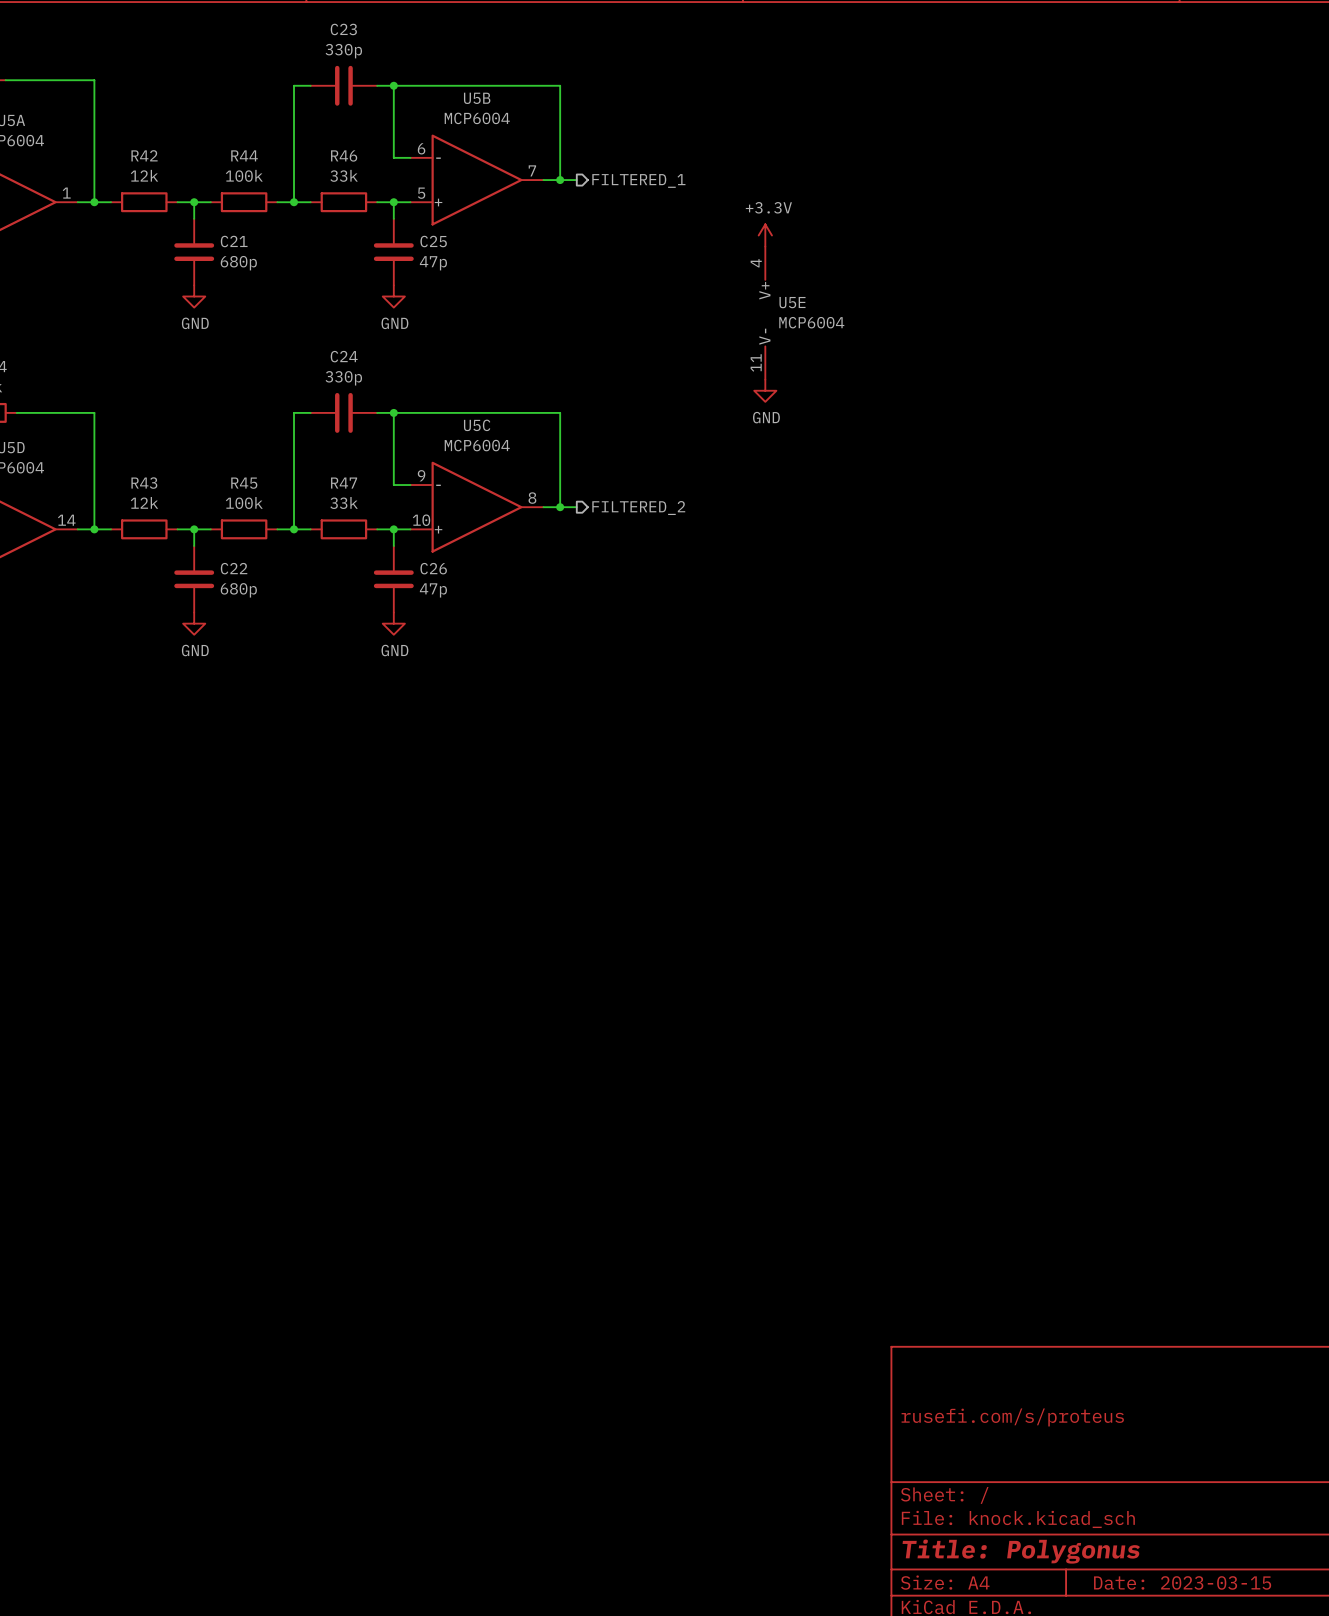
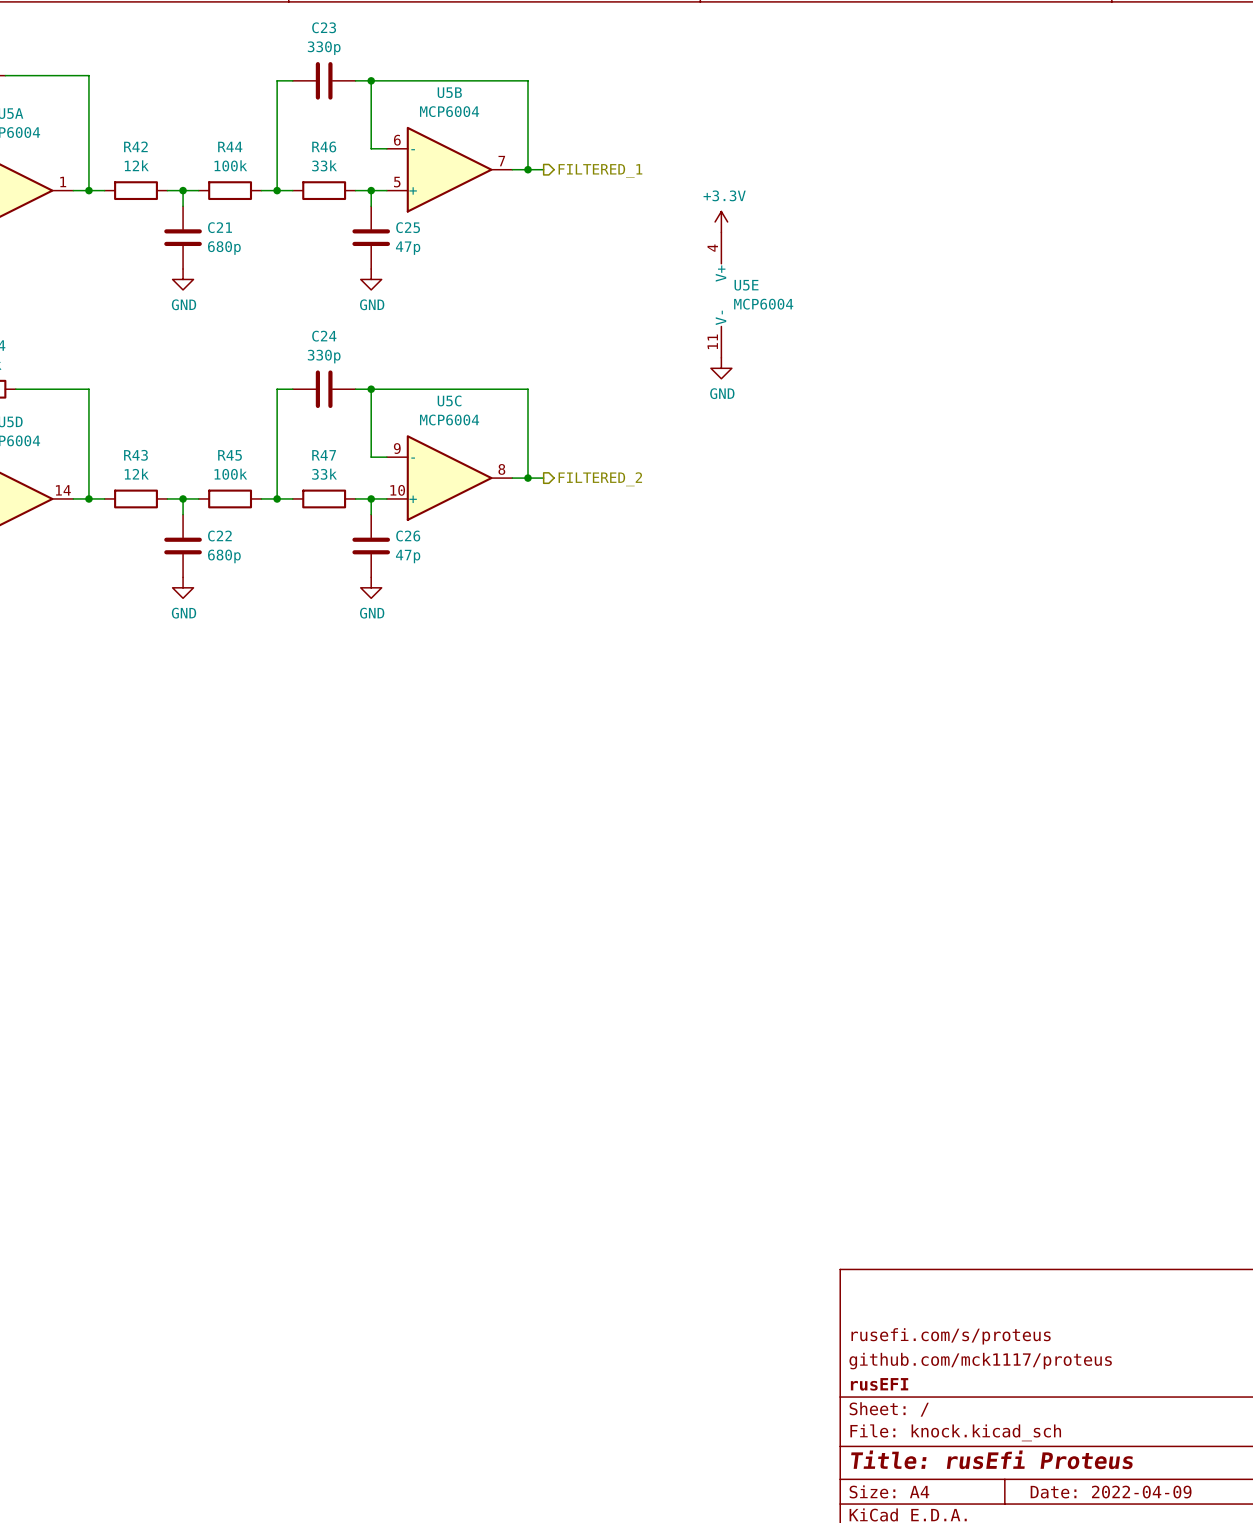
title block: none -> github.com/mck1117/proteus (980, 1361)
title block: none -> rusEFI (879, 1384)
title block: Title: Polygonus (1021, 1551) -> Title: rusEfi Proteus (991, 1459)
title block: Date: 2023-03-15 (1182, 1582) -> Date: 2022-04-09 (1111, 1492)

